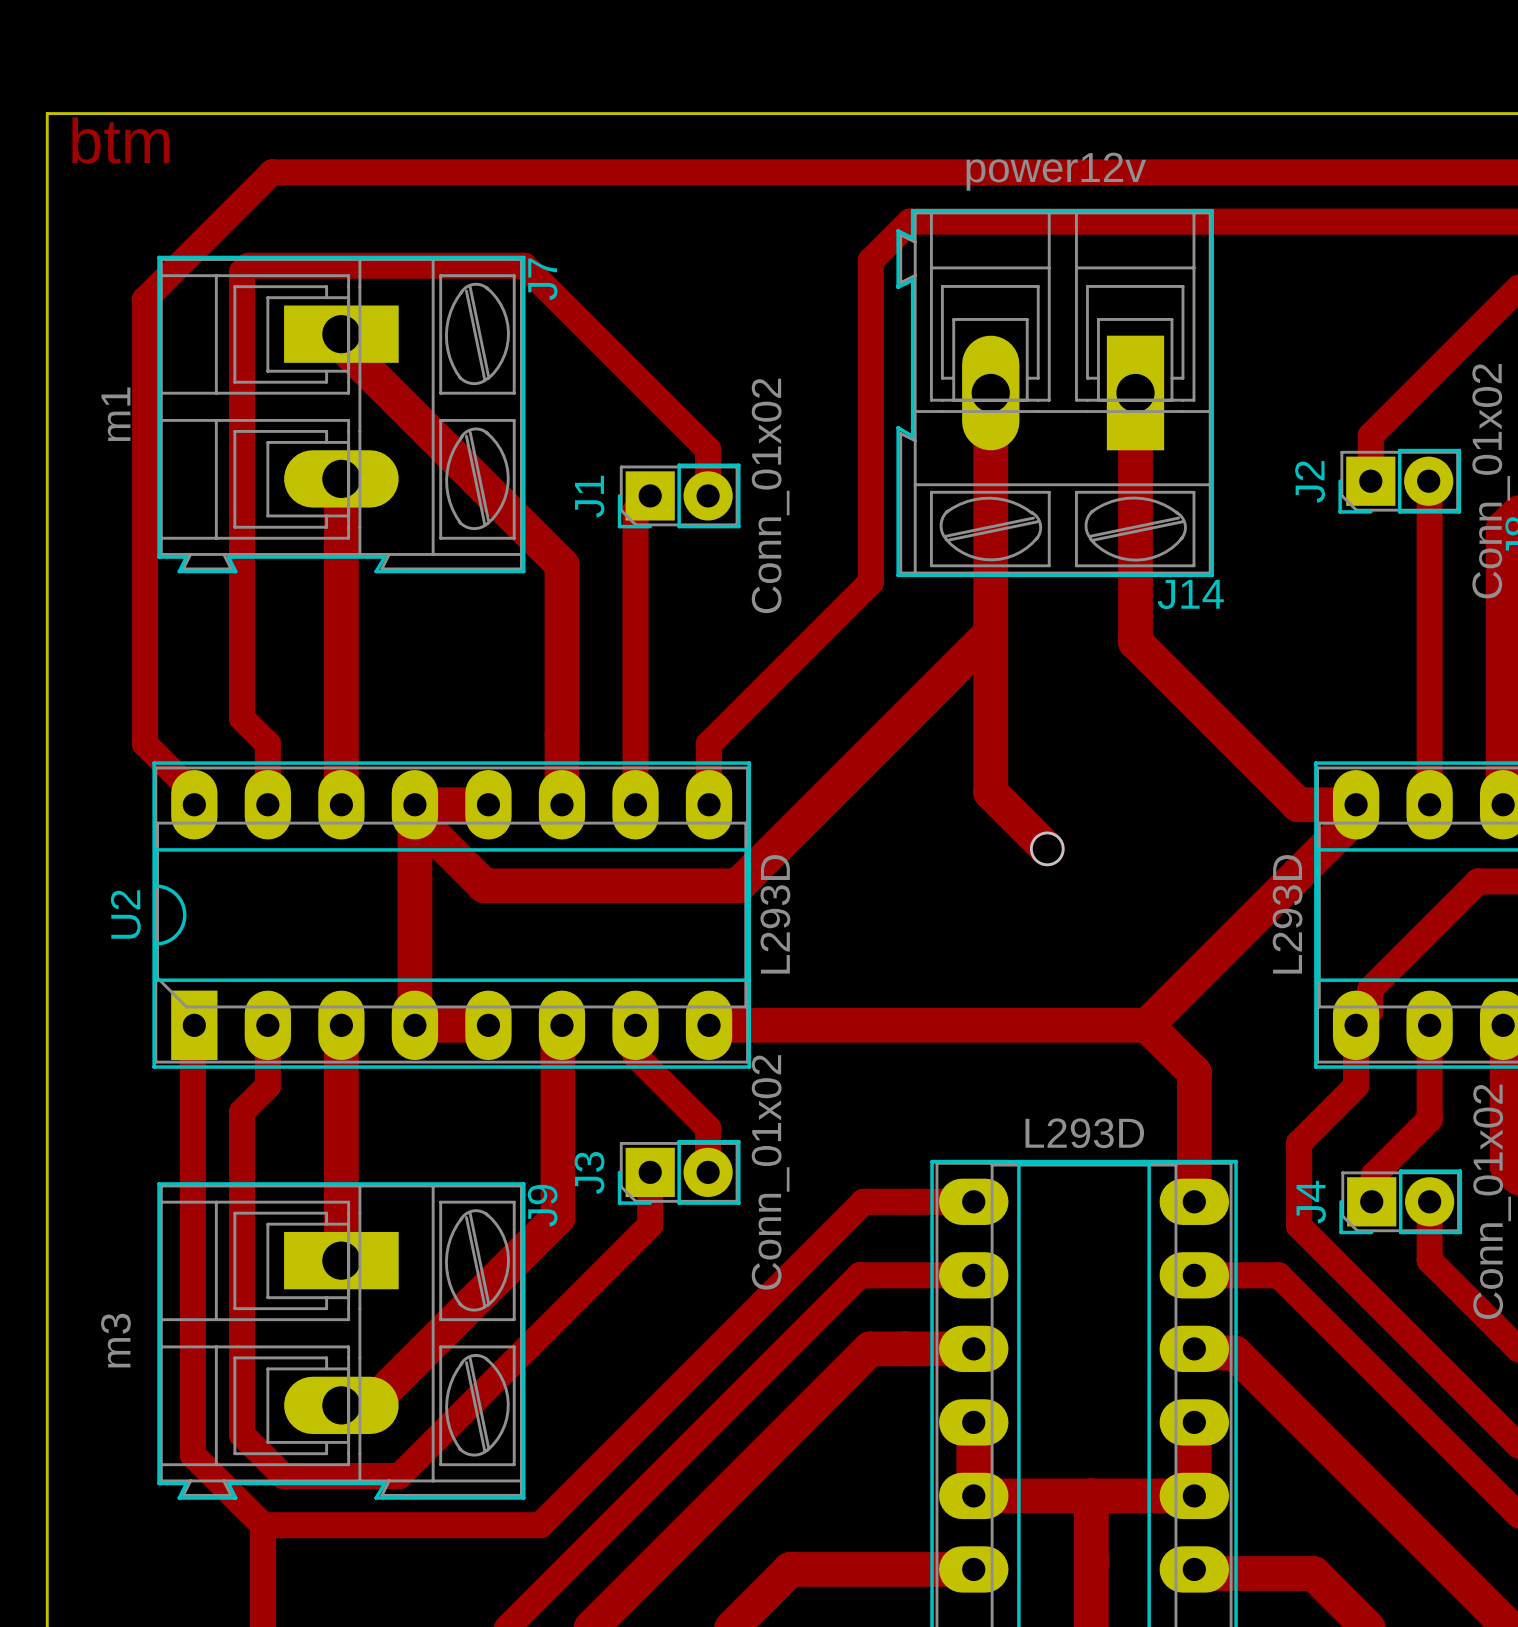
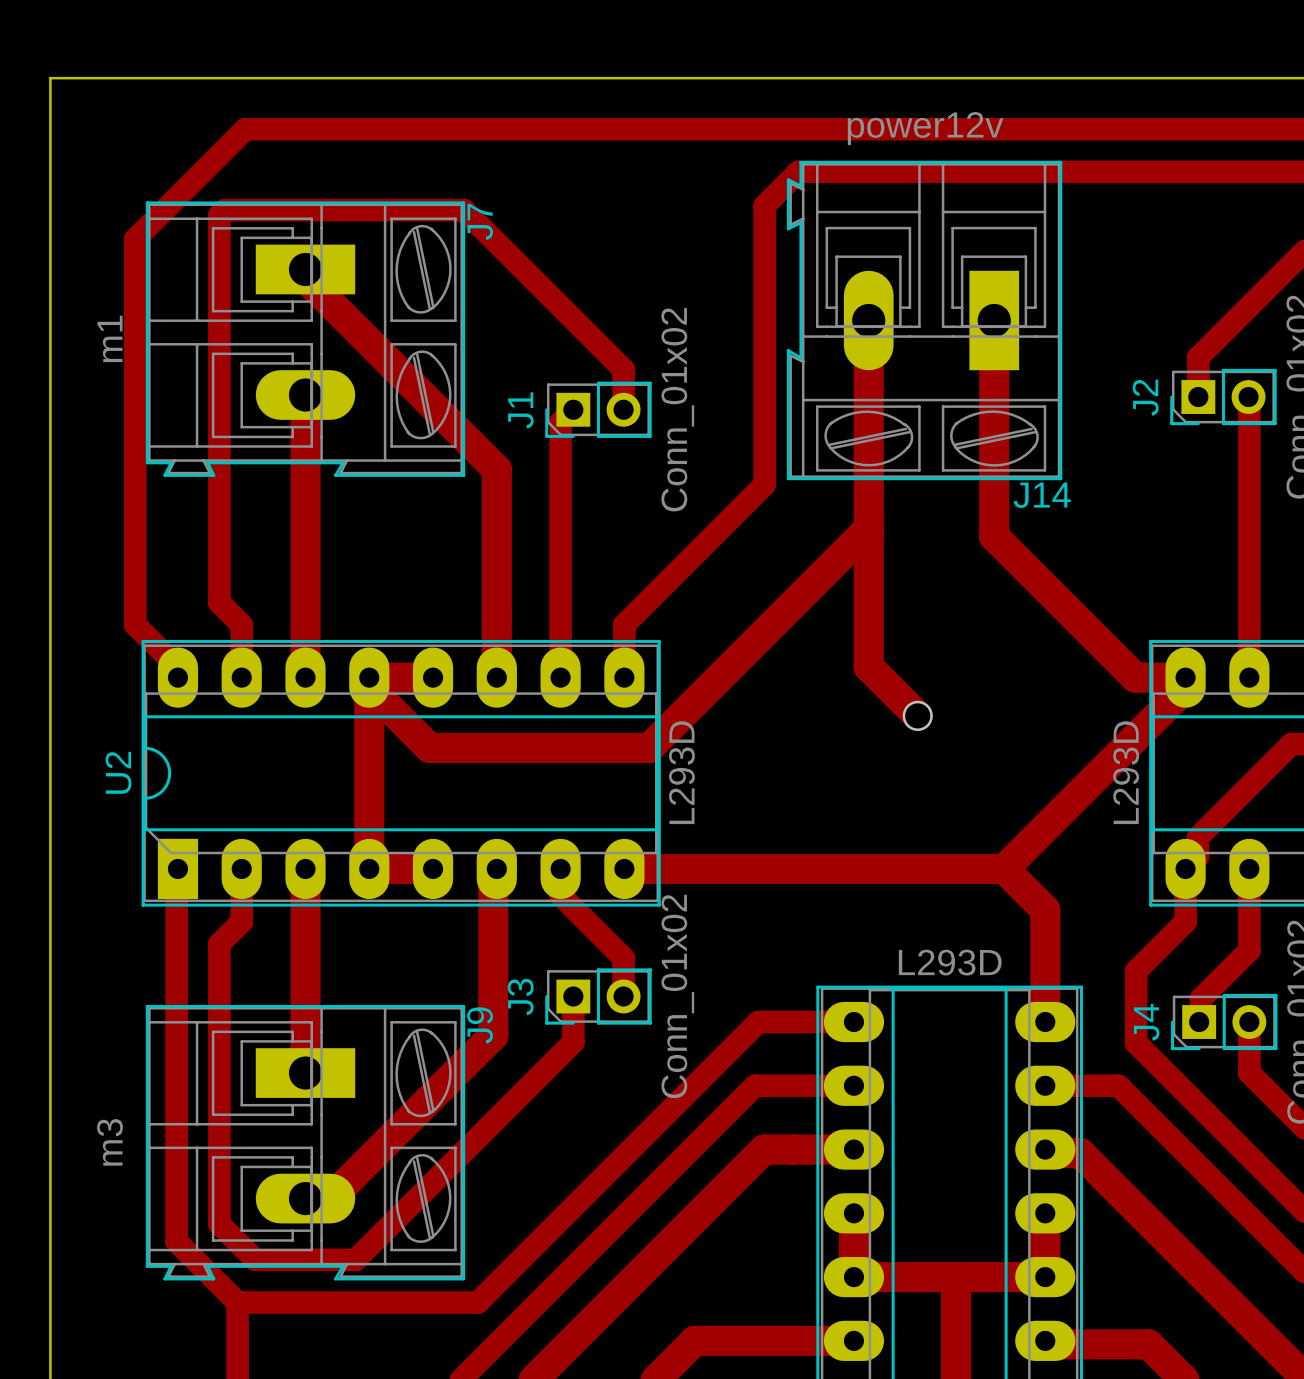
text: btm (120, 140) -> none
J2 footprint: [1338, 448, 1462, 514] -> [1170, 368, 1277, 426]
J1 footprint: [617, 463, 741, 529] -> [545, 381, 652, 438]
J3 footprint: [617, 1139, 741, 1205] -> [545, 968, 652, 1025]
J4 footprint: [1339, 1169, 1463, 1235] -> [1171, 993, 1278, 1051]

